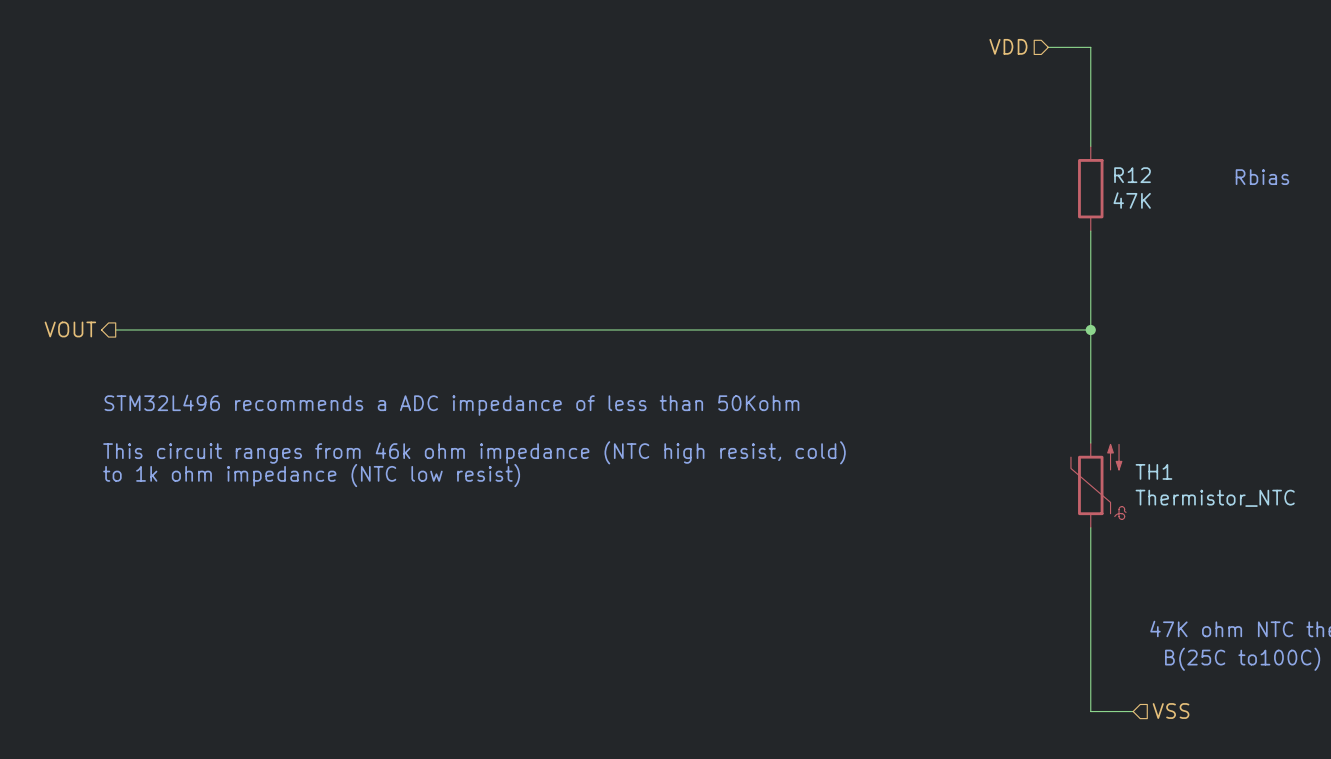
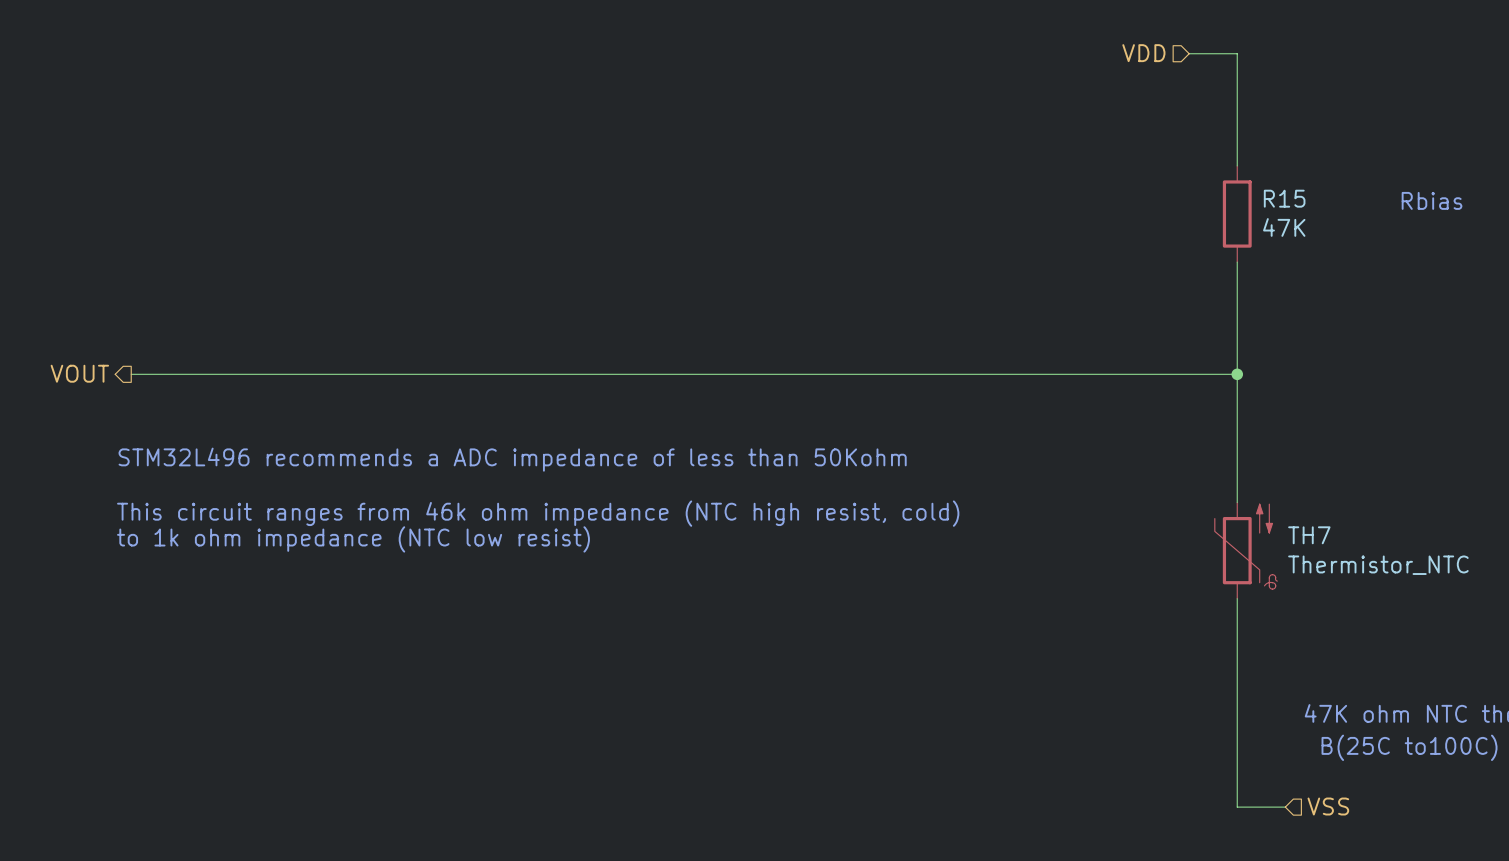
R12 name: R12 (1132, 175) -> R15 (1284, 198)
TH1 name: TH1 (1153, 471) -> TH7 (1309, 535)

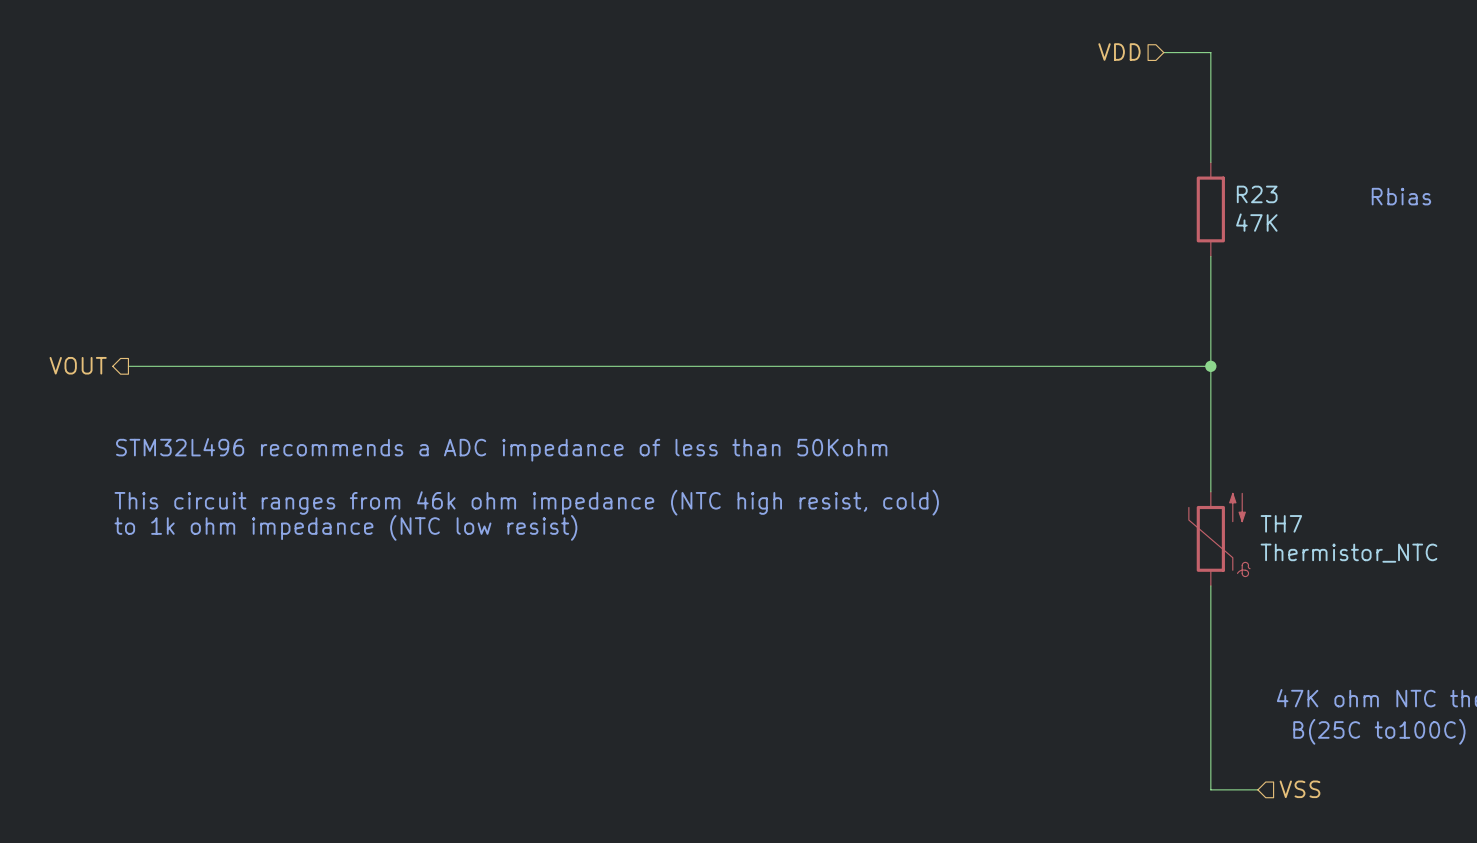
R15 name: R15 (1284, 198) -> R23 (1257, 194)

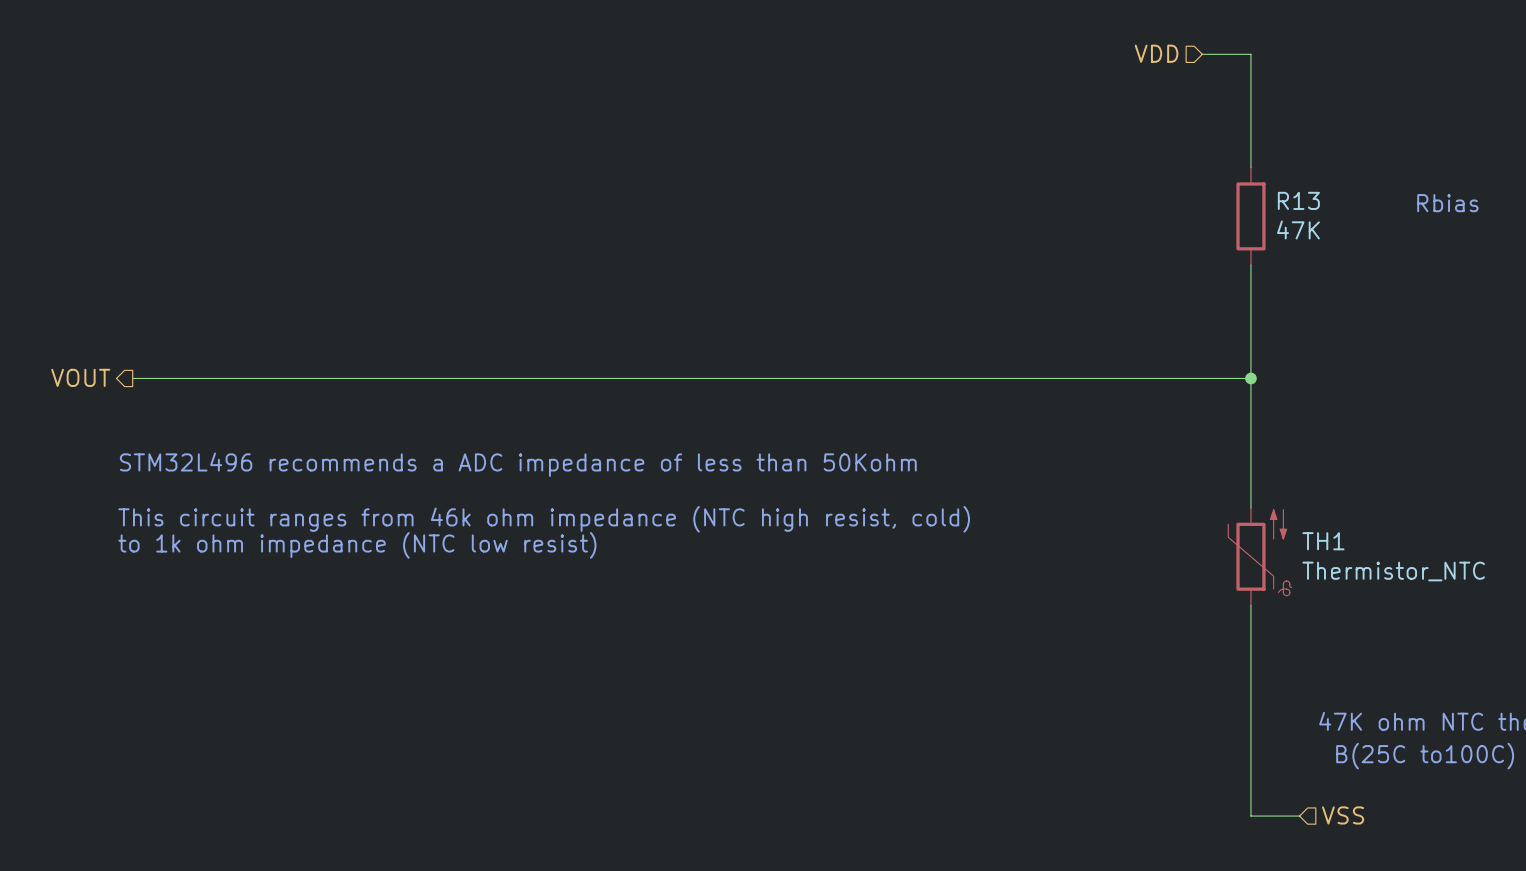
R23 name: R23 (1257, 194) -> R13 (1298, 200)
TH7 name: TH7 (1281, 523) -> TH1 (1323, 541)

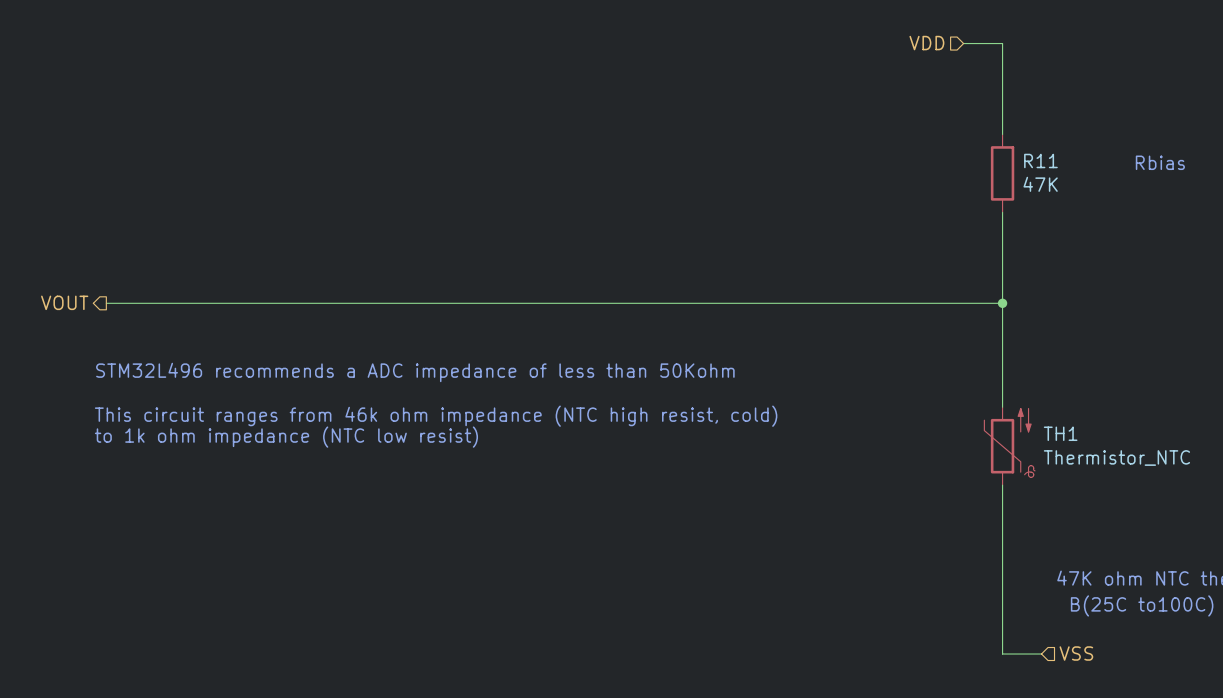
R13 name: R13 (1298, 200) -> R11 (1040, 160)

